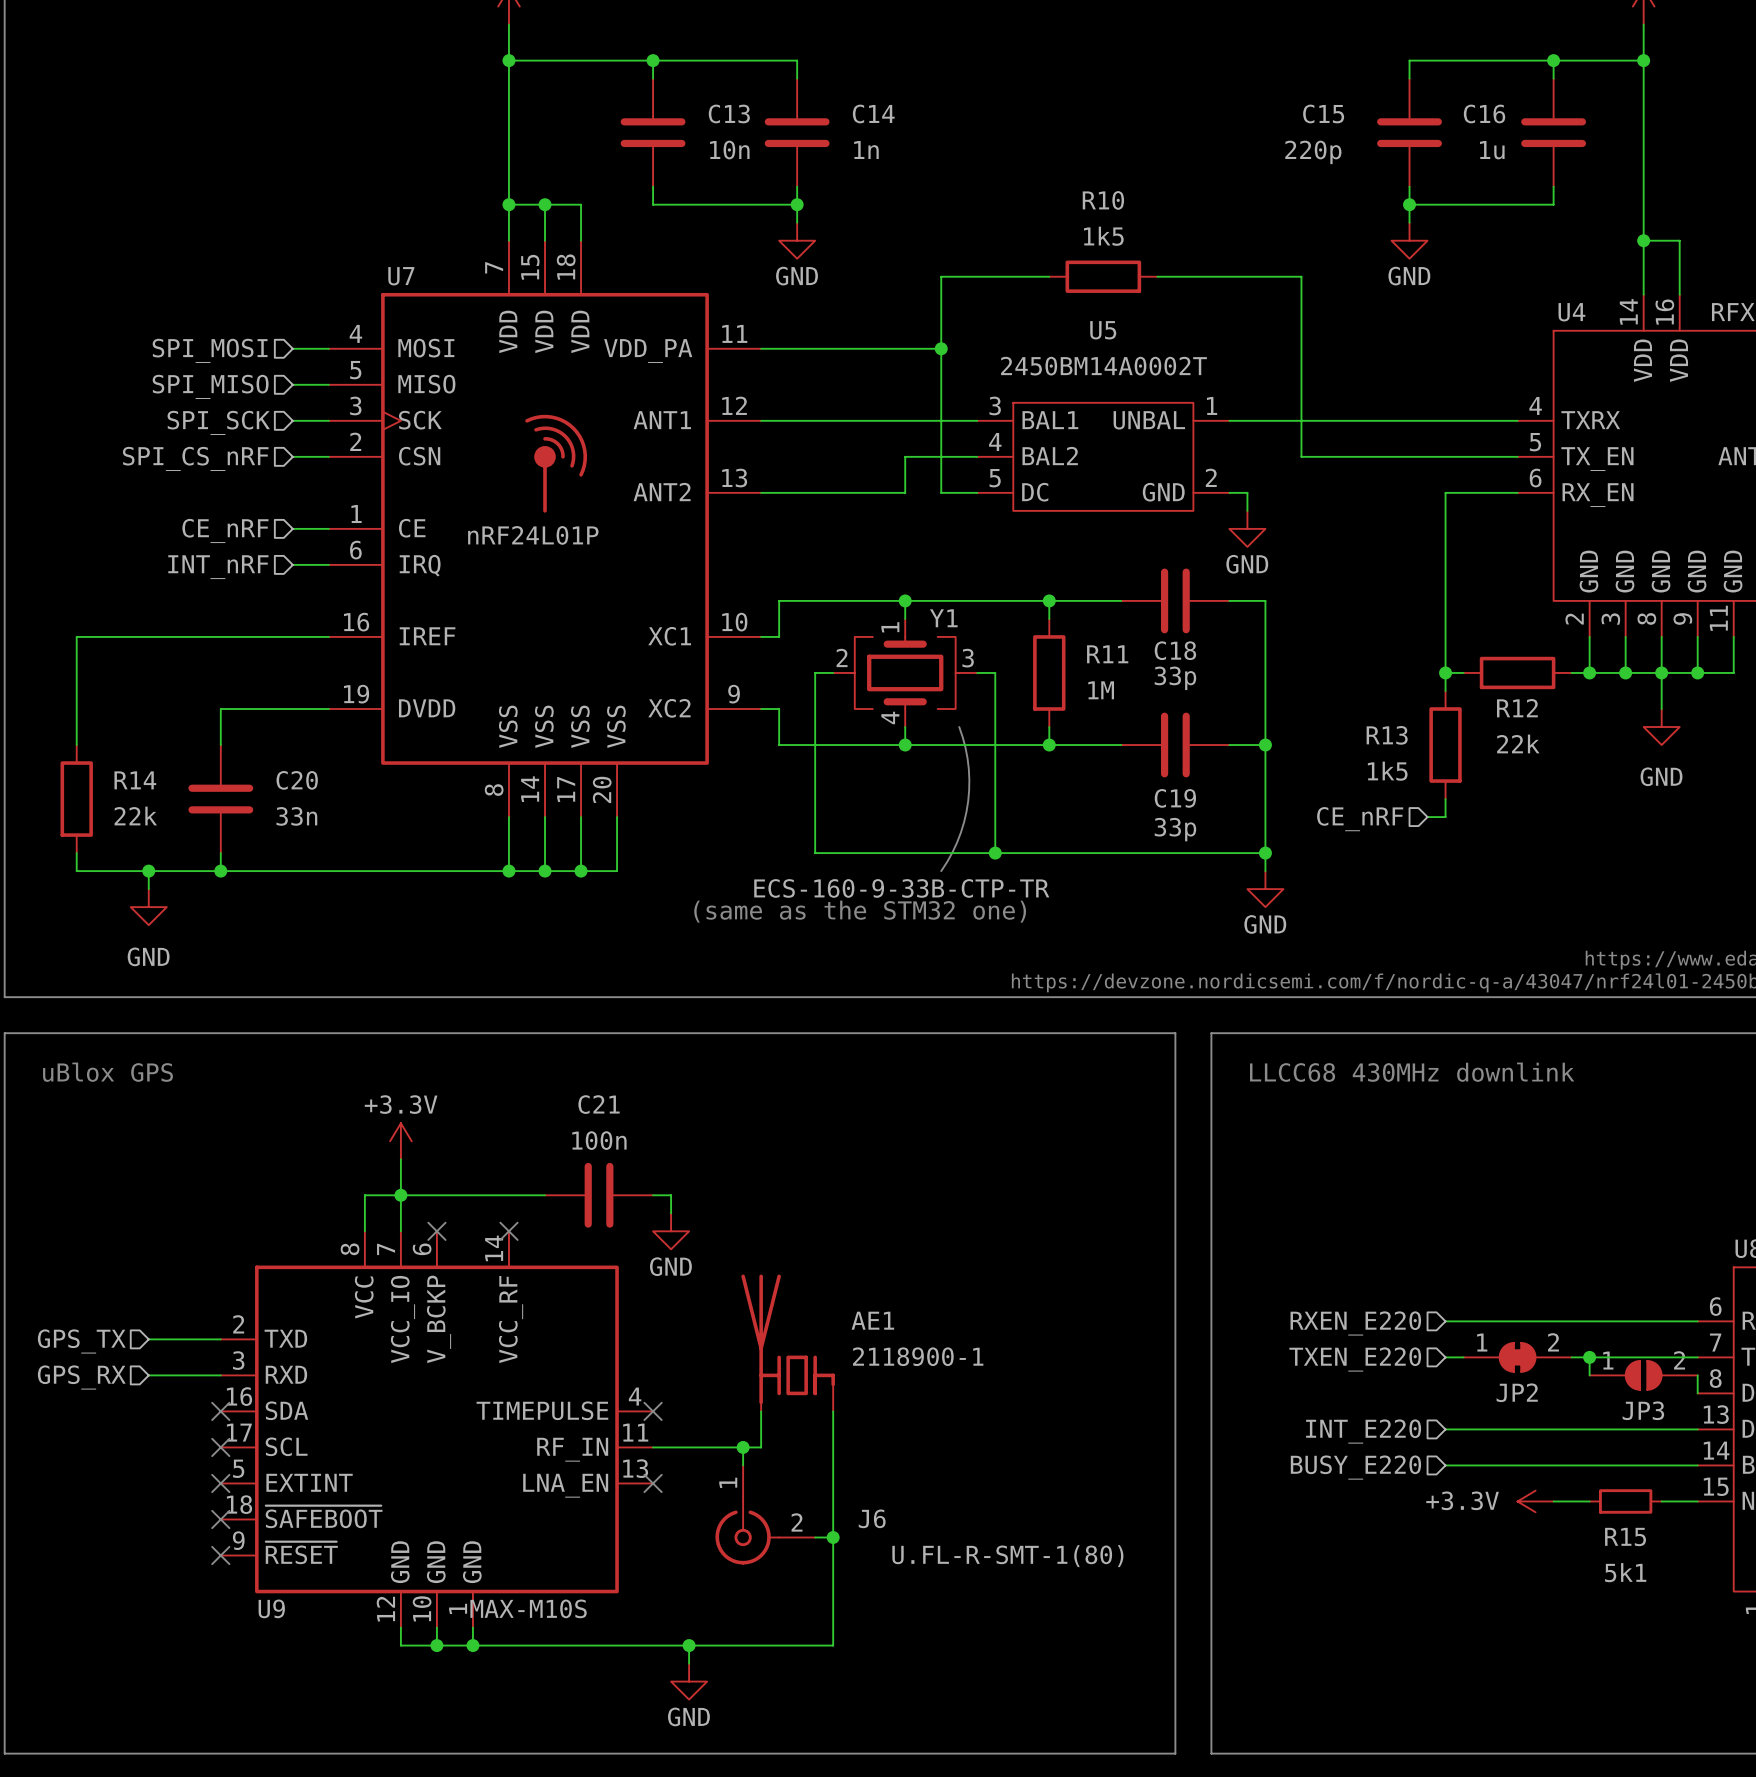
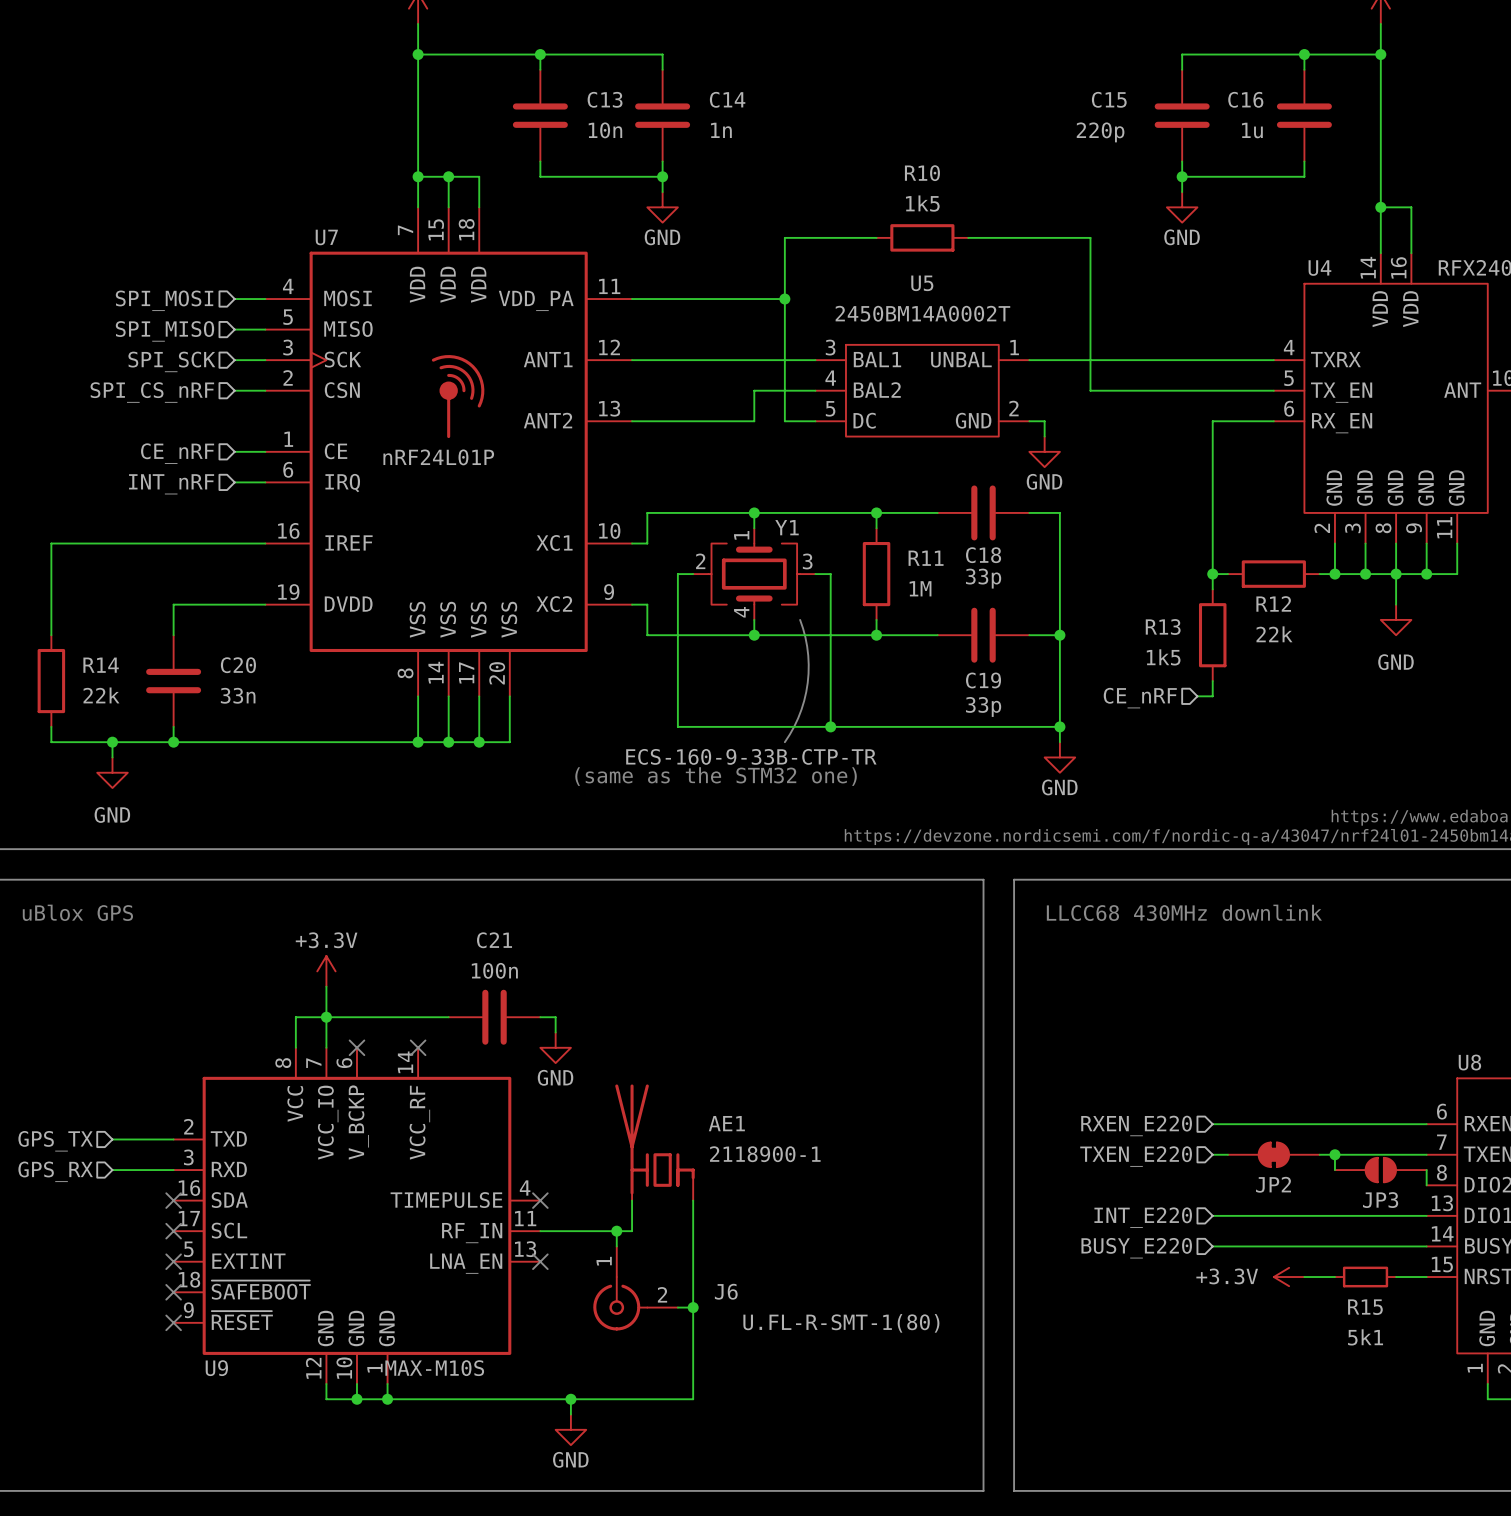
JP2 pin number: 1 (1482, 1342) -> none
JP2 pin number: 2 (1553, 1342) -> none
JP3 pin number: 1 (1608, 1360) -> none
JP3 pin number: 2 (1679, 1360) -> none

